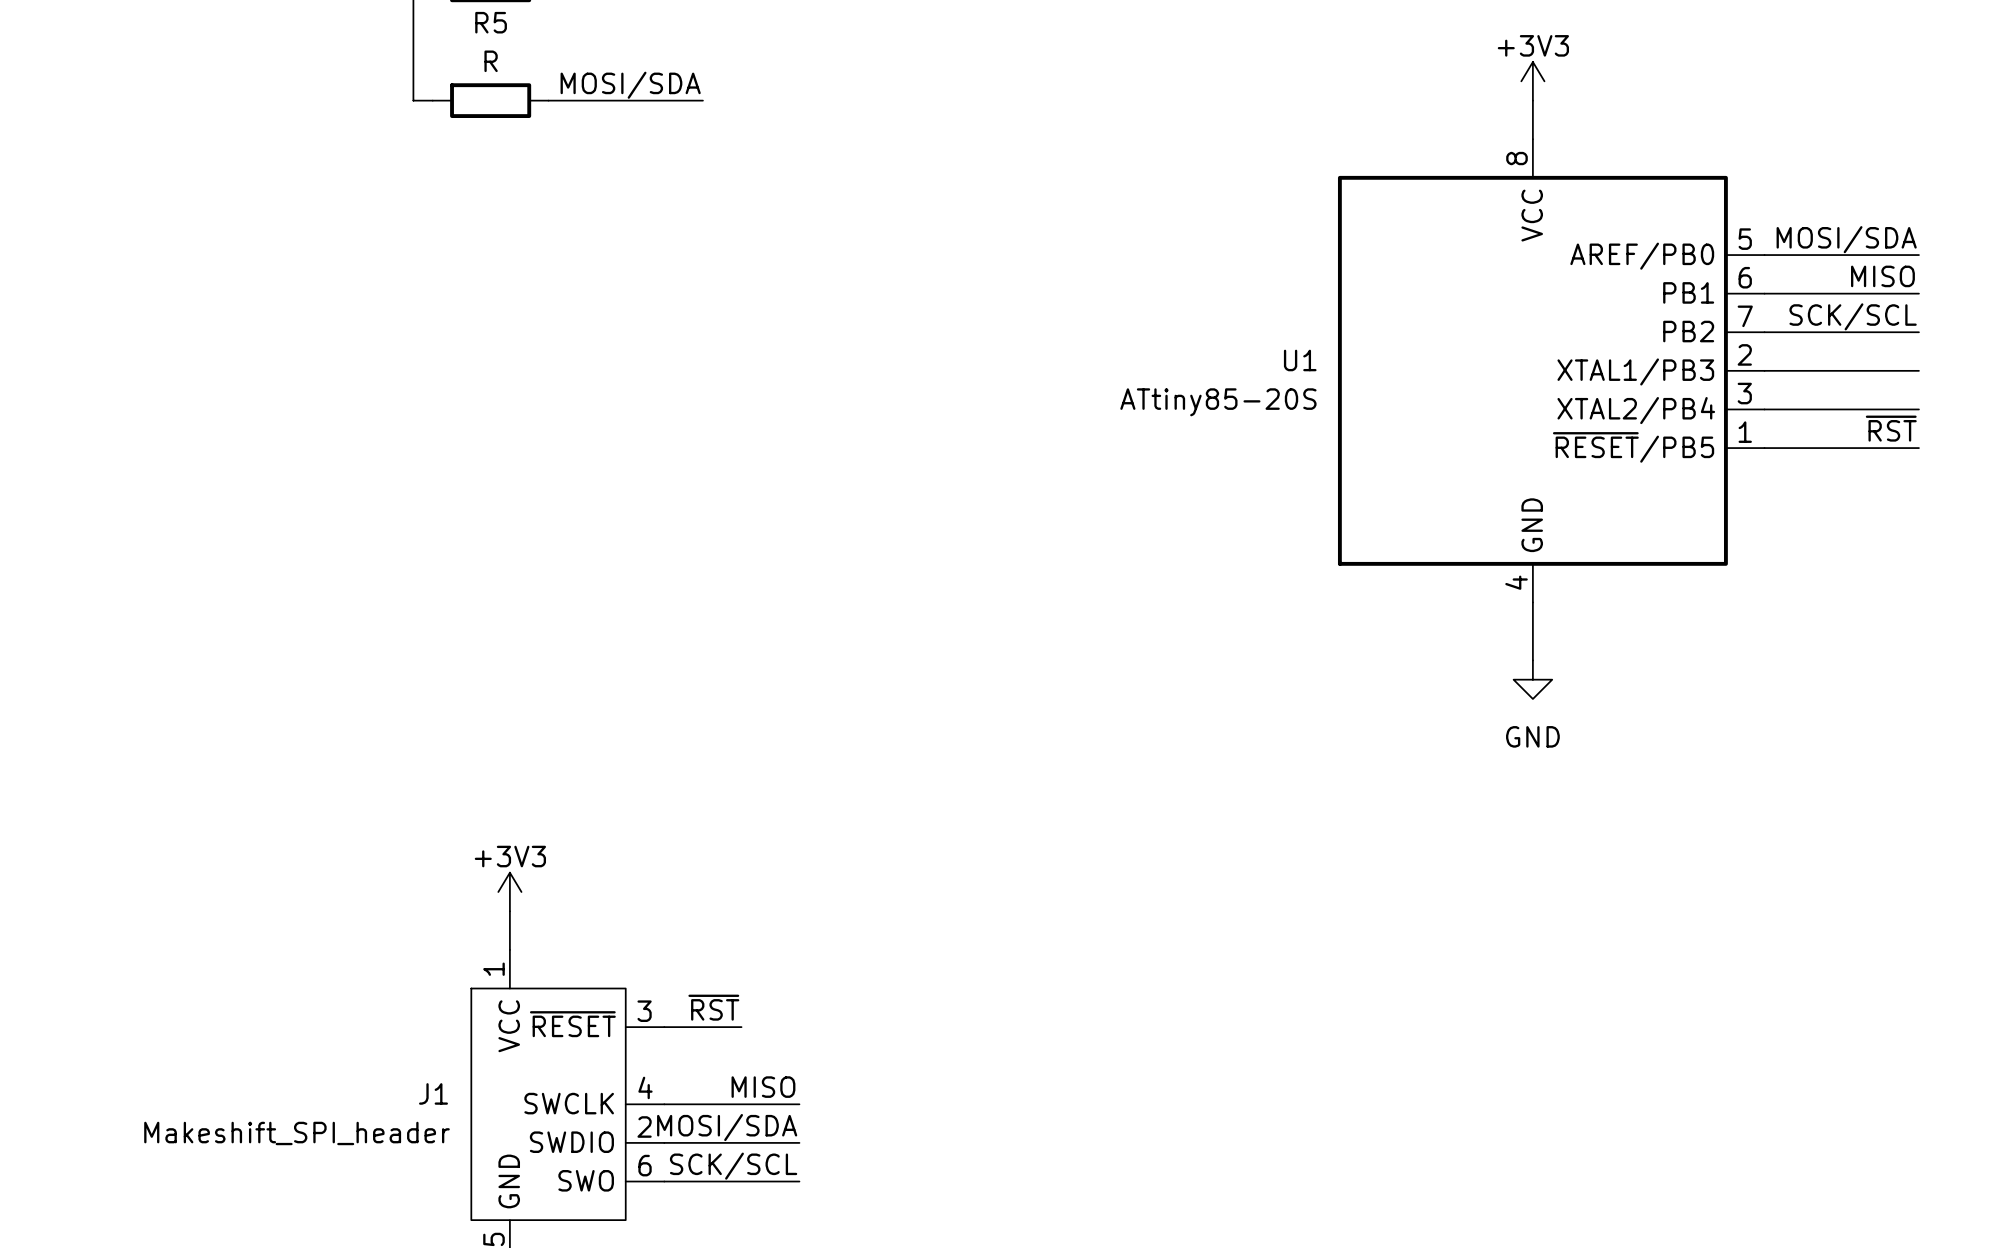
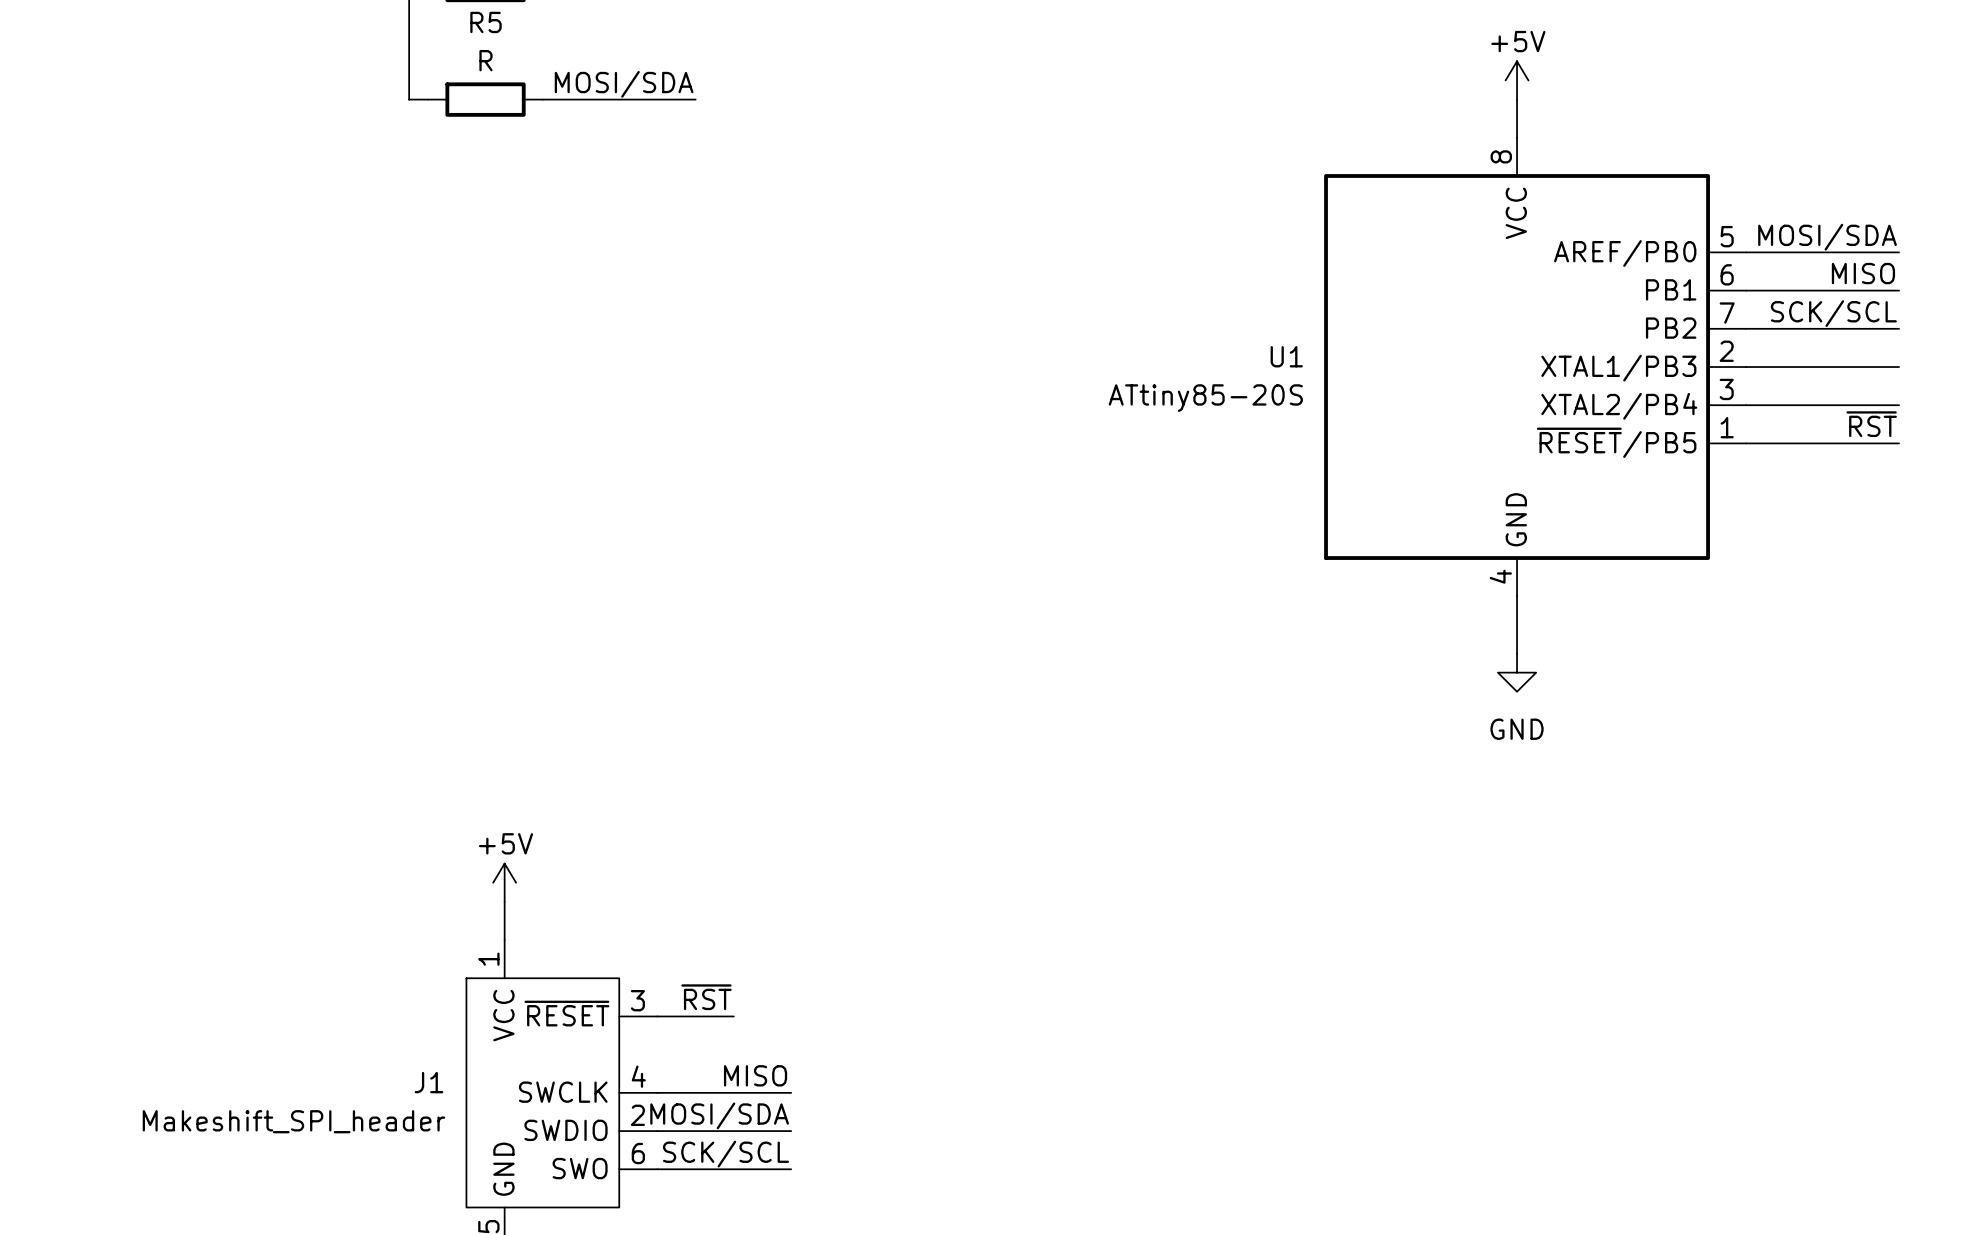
power symbol: +3V3 (1532, 81) -> +5V (1517, 80)
power symbol: +3V3 (509, 892) -> +5V (504, 882)

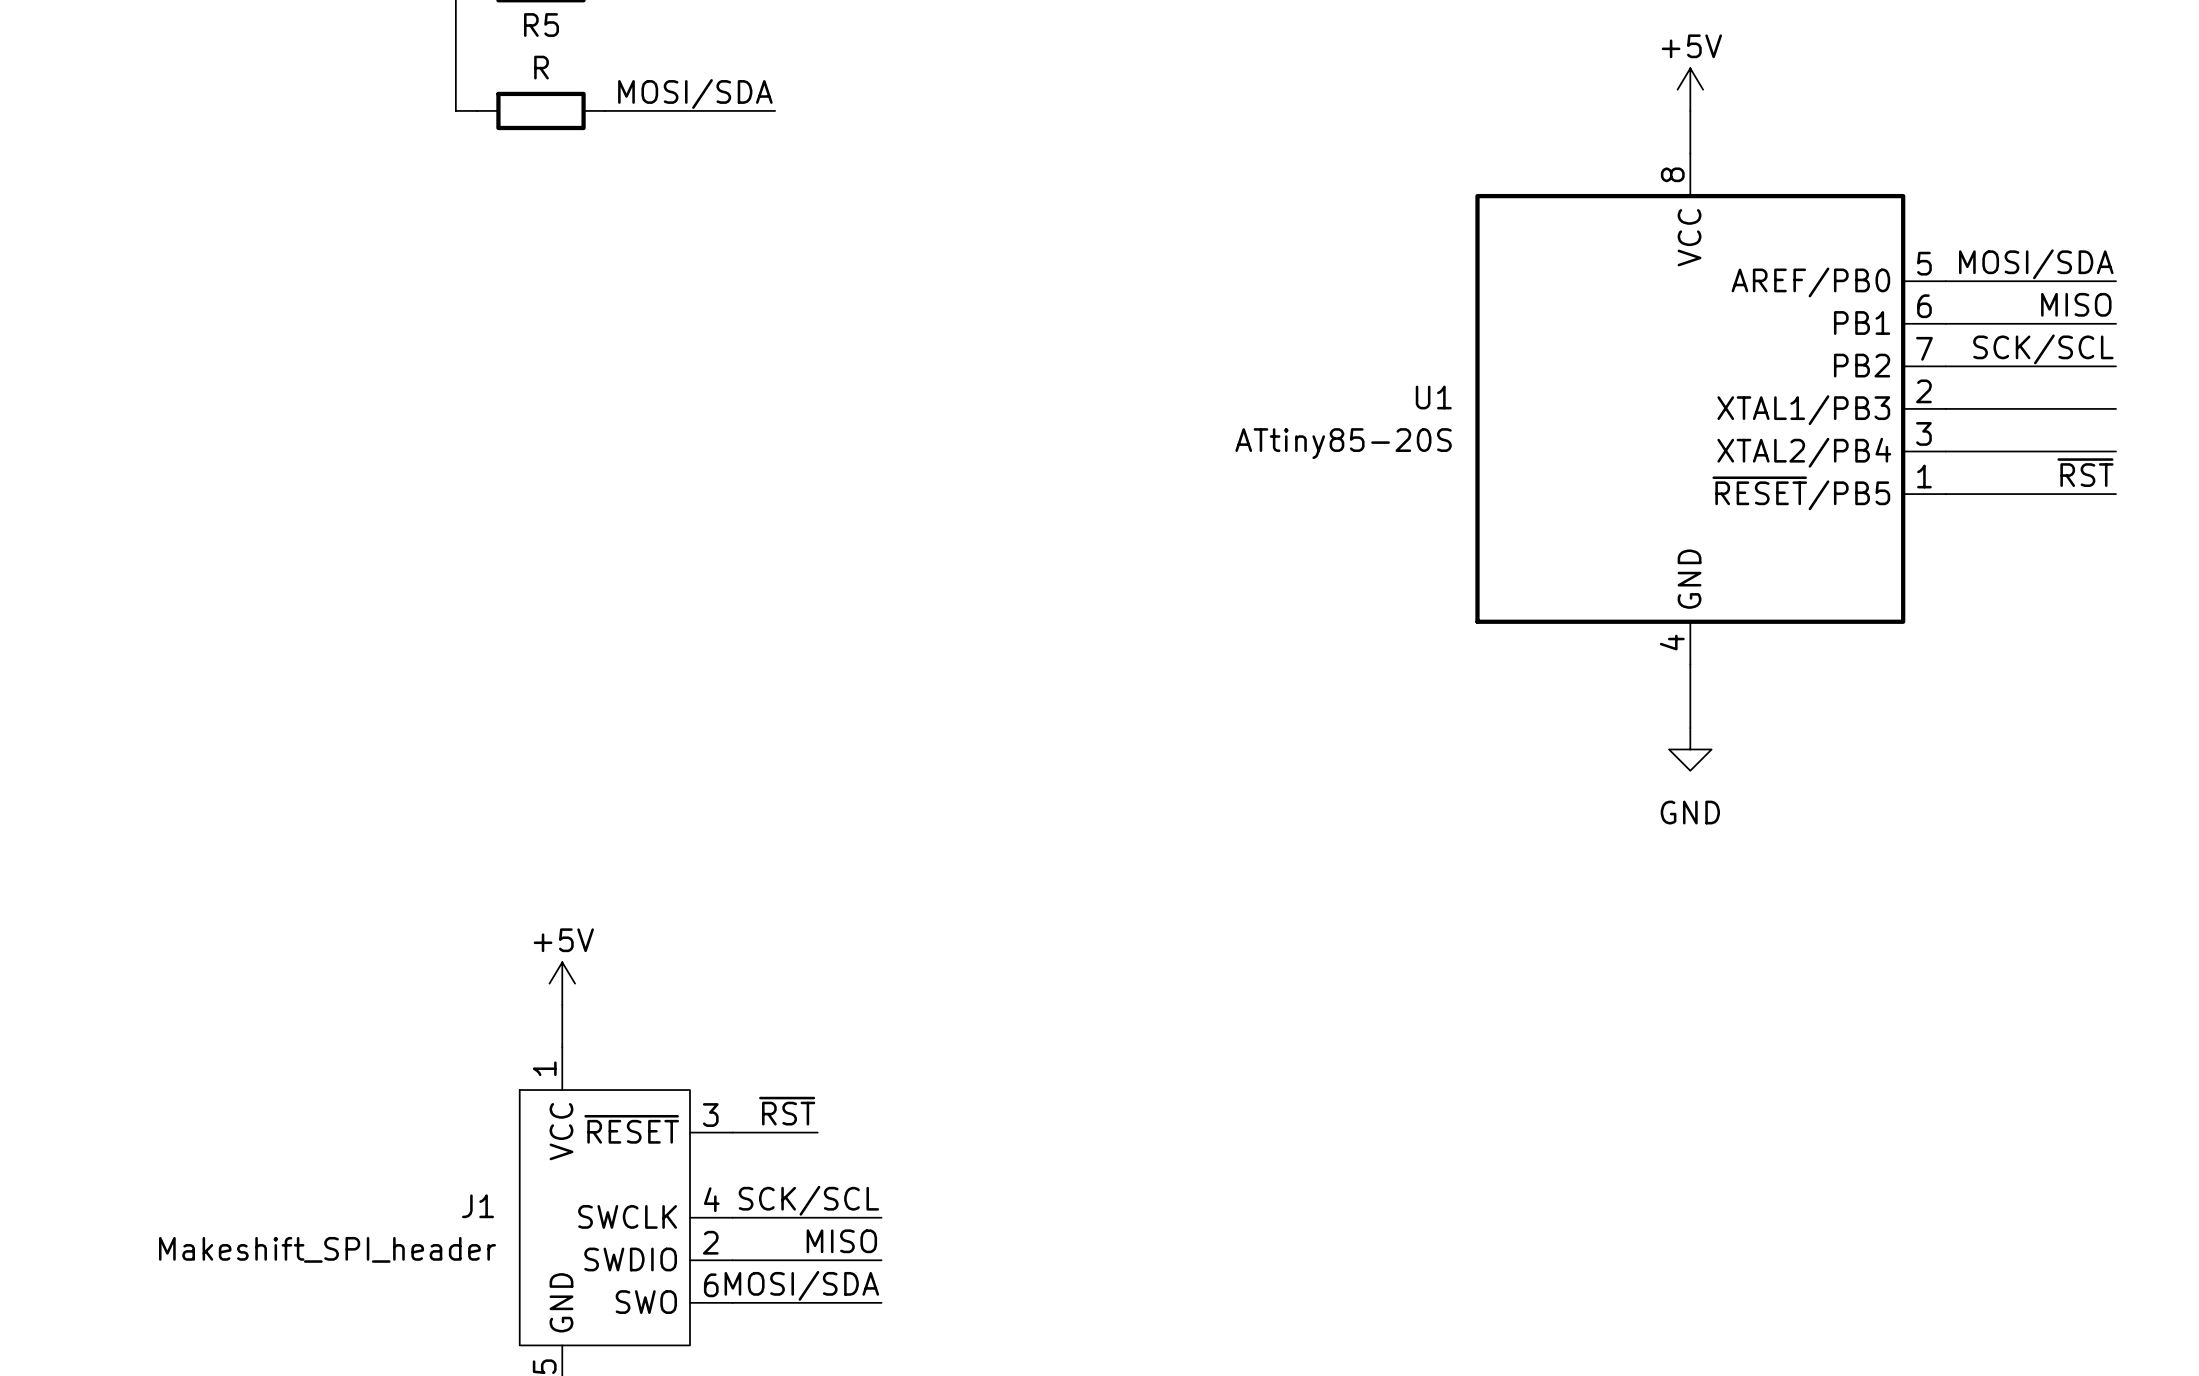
label: MISO (755, 1075) -> SCK/SCL (808, 1200)
label: MOSI/SDA (719, 1115) -> MISO (841, 1241)
label: SCK/SCL (725, 1154) -> MOSI/SDA (801, 1285)

